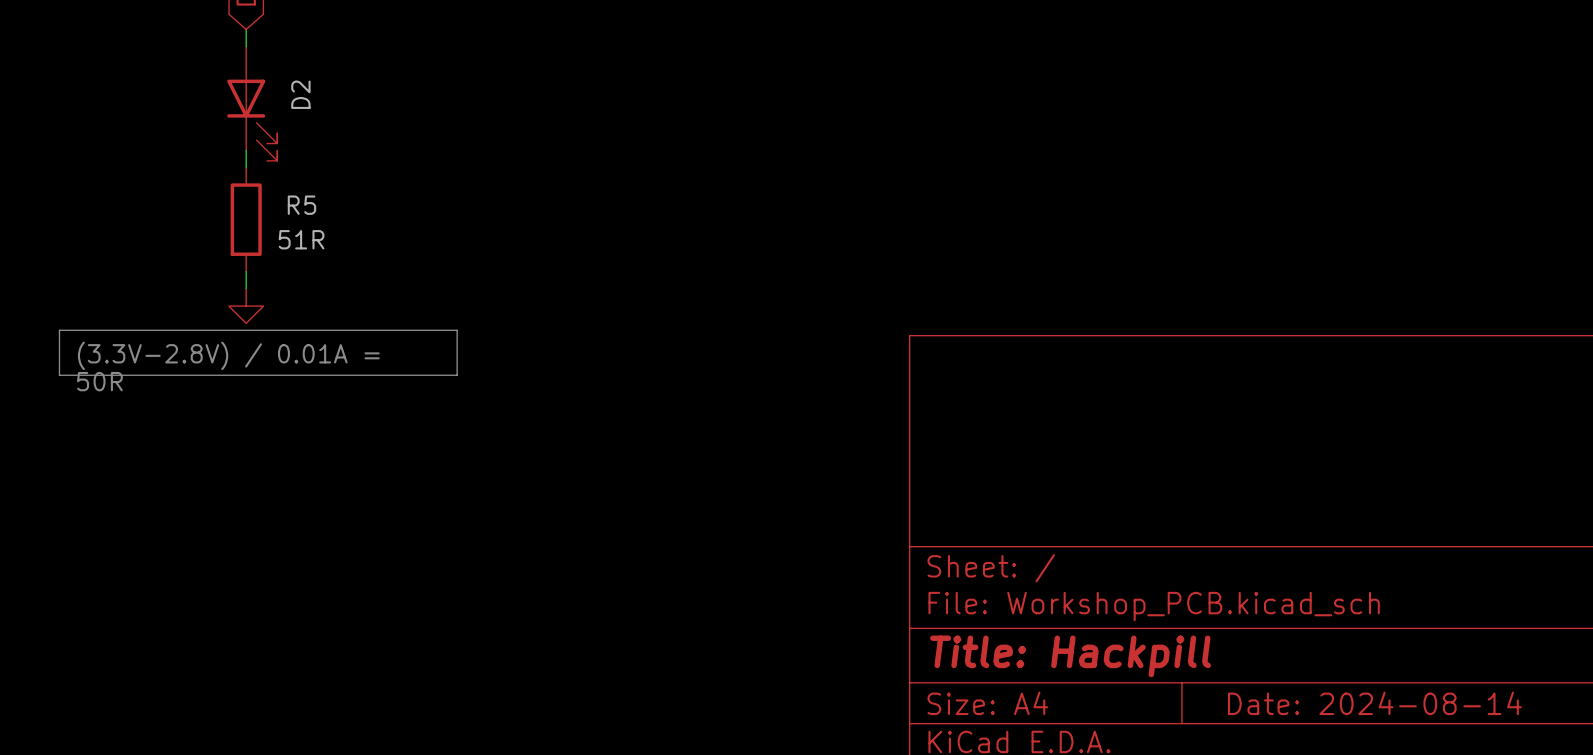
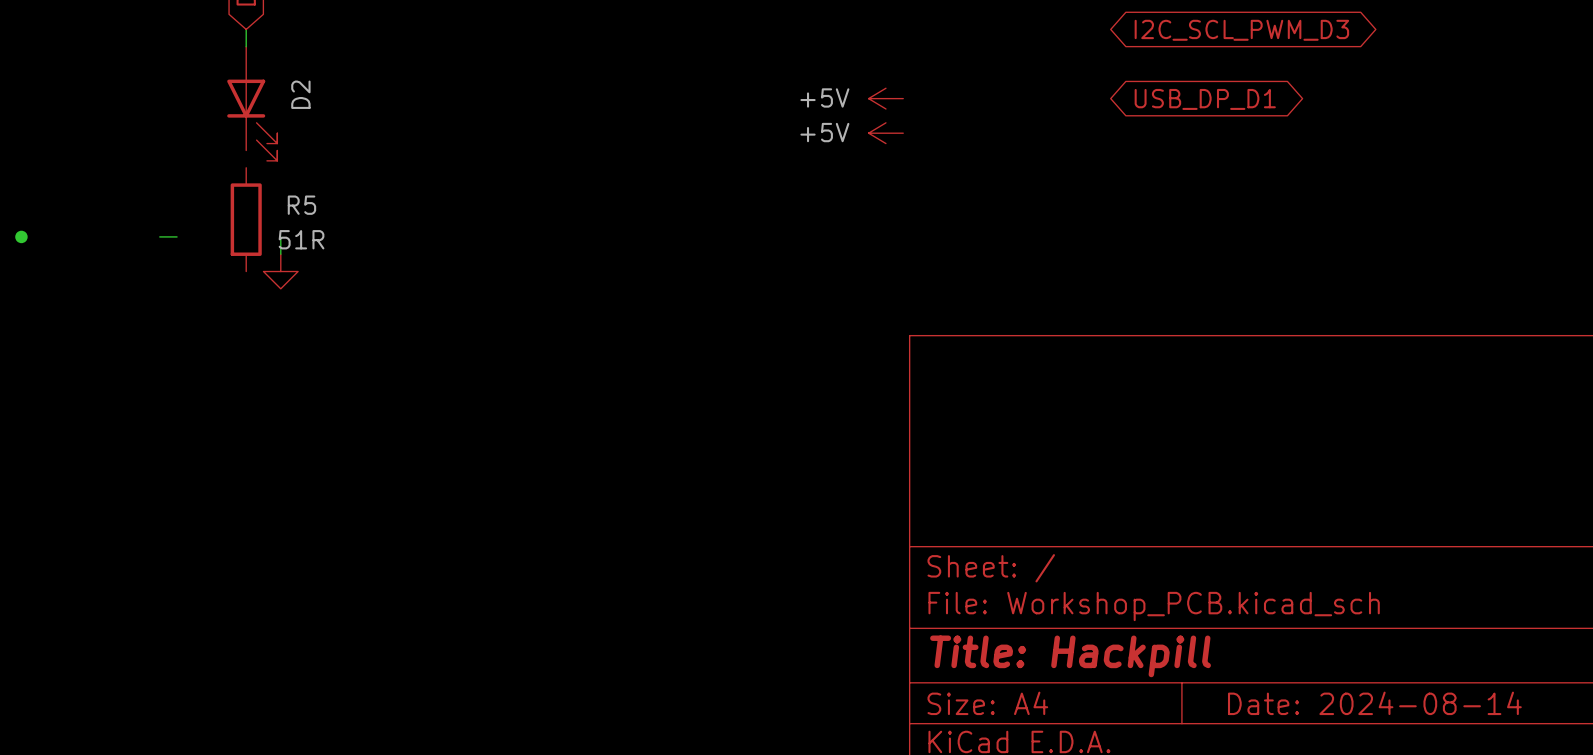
global label: none -> I2C_SCL_PWM_D3 (1241, 30)
power symbol: none -> +5V (885, 98)
global label: none -> USB_DP_D1 (1205, 99)
power symbol: none -> +5V (885, 133)
wire: (246, 150) (246, 167) -> none
junction: none -> (21, 236)
wire: none -> (159, 236) (177, 236)
wire: (246, 271) (246, 288) -> (280, 236) (280, 254)
power symbol position: (246, 306) -> (280, 271)
line: (59, 330) (457, 330) (457, 375) (59, 375) (59, 330) -> none
text: (3.3V-2.8V) / 0.01A = (228, 355) -> none
text: 50R (99, 381) -> none

